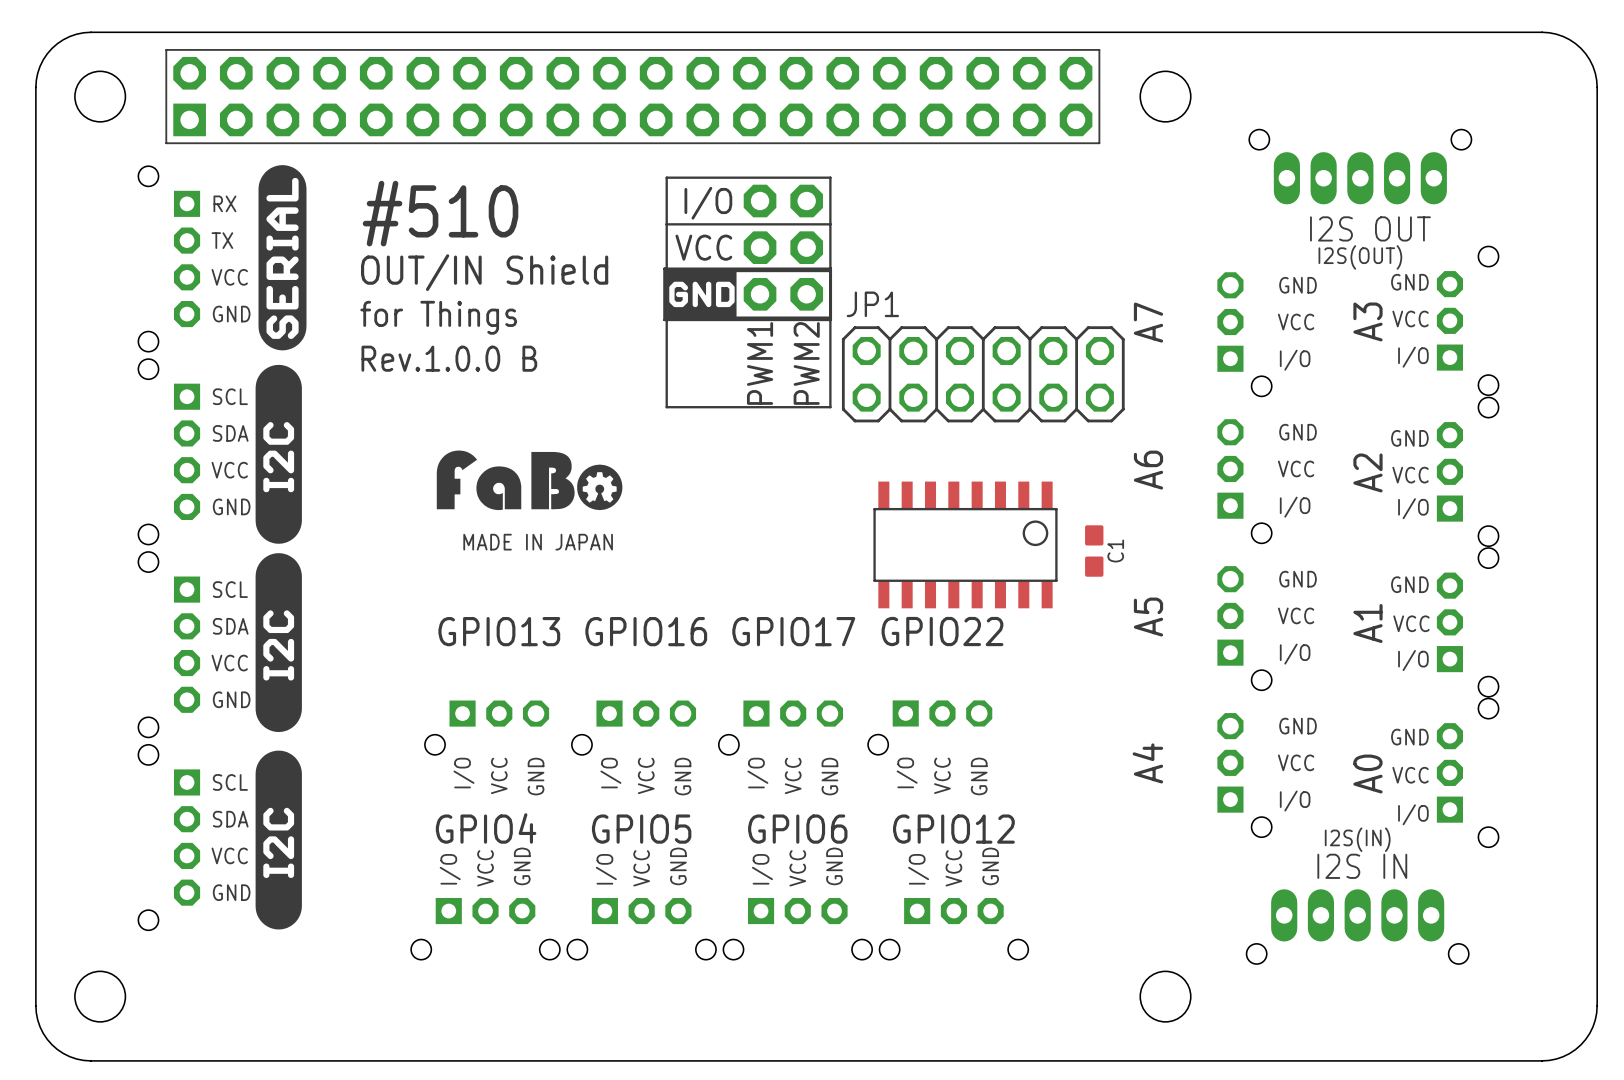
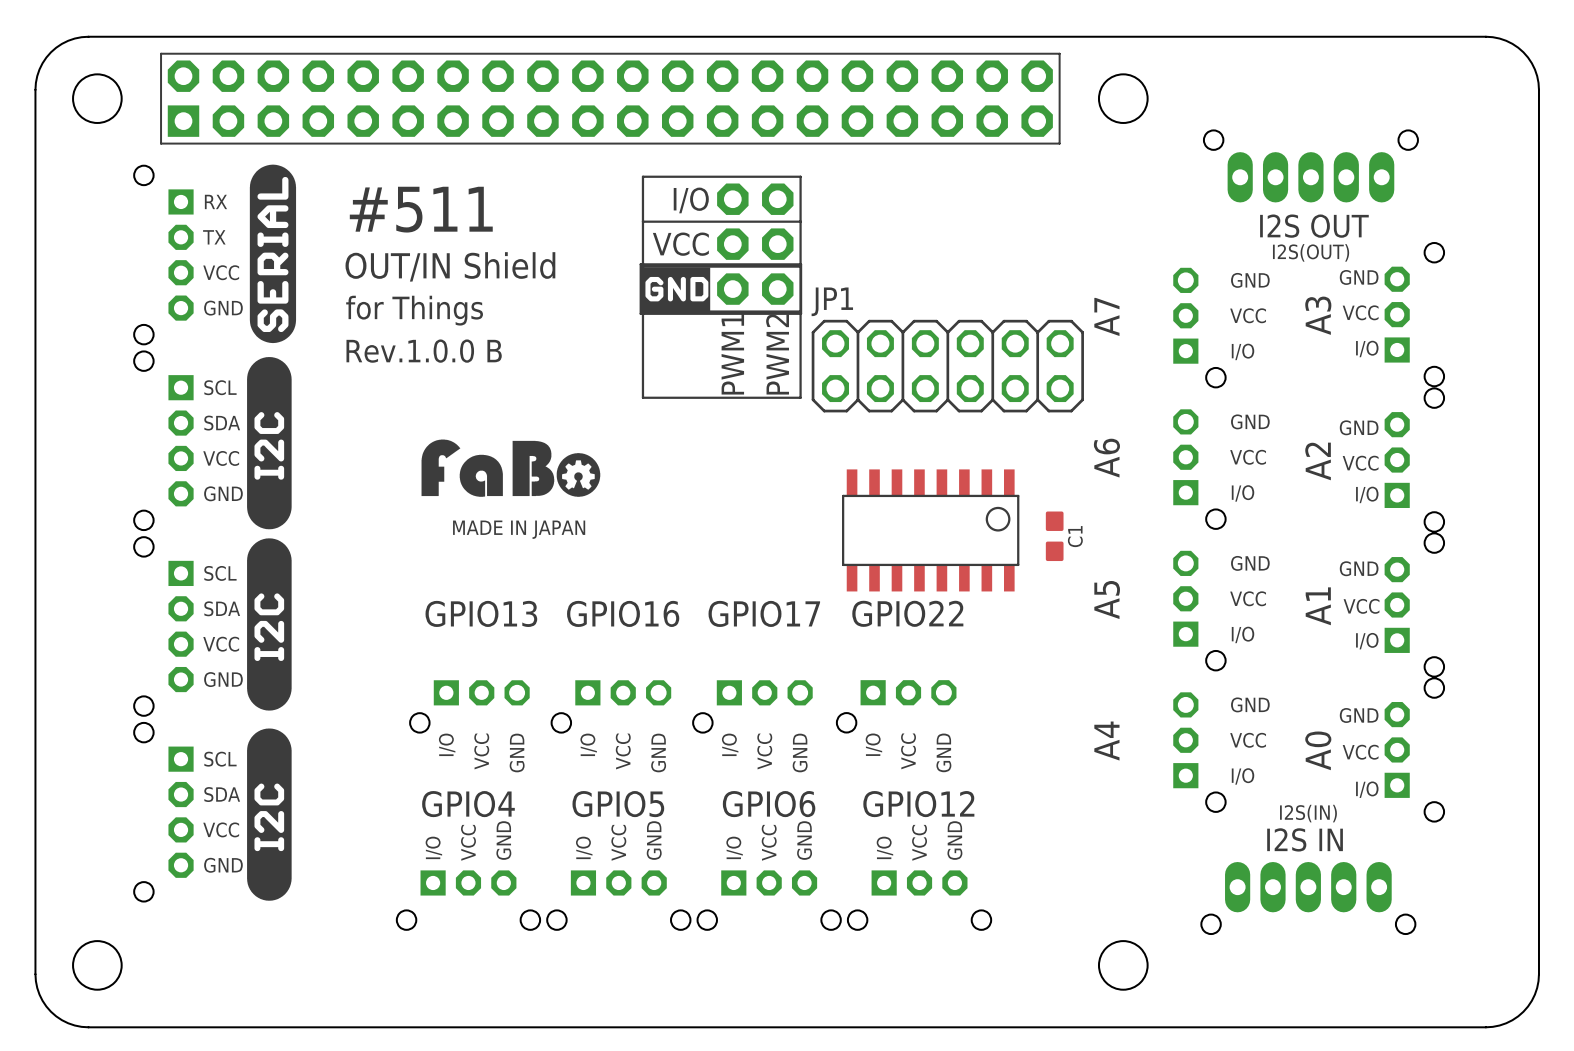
text: #510 (440, 213) -> #511 (421, 209)

